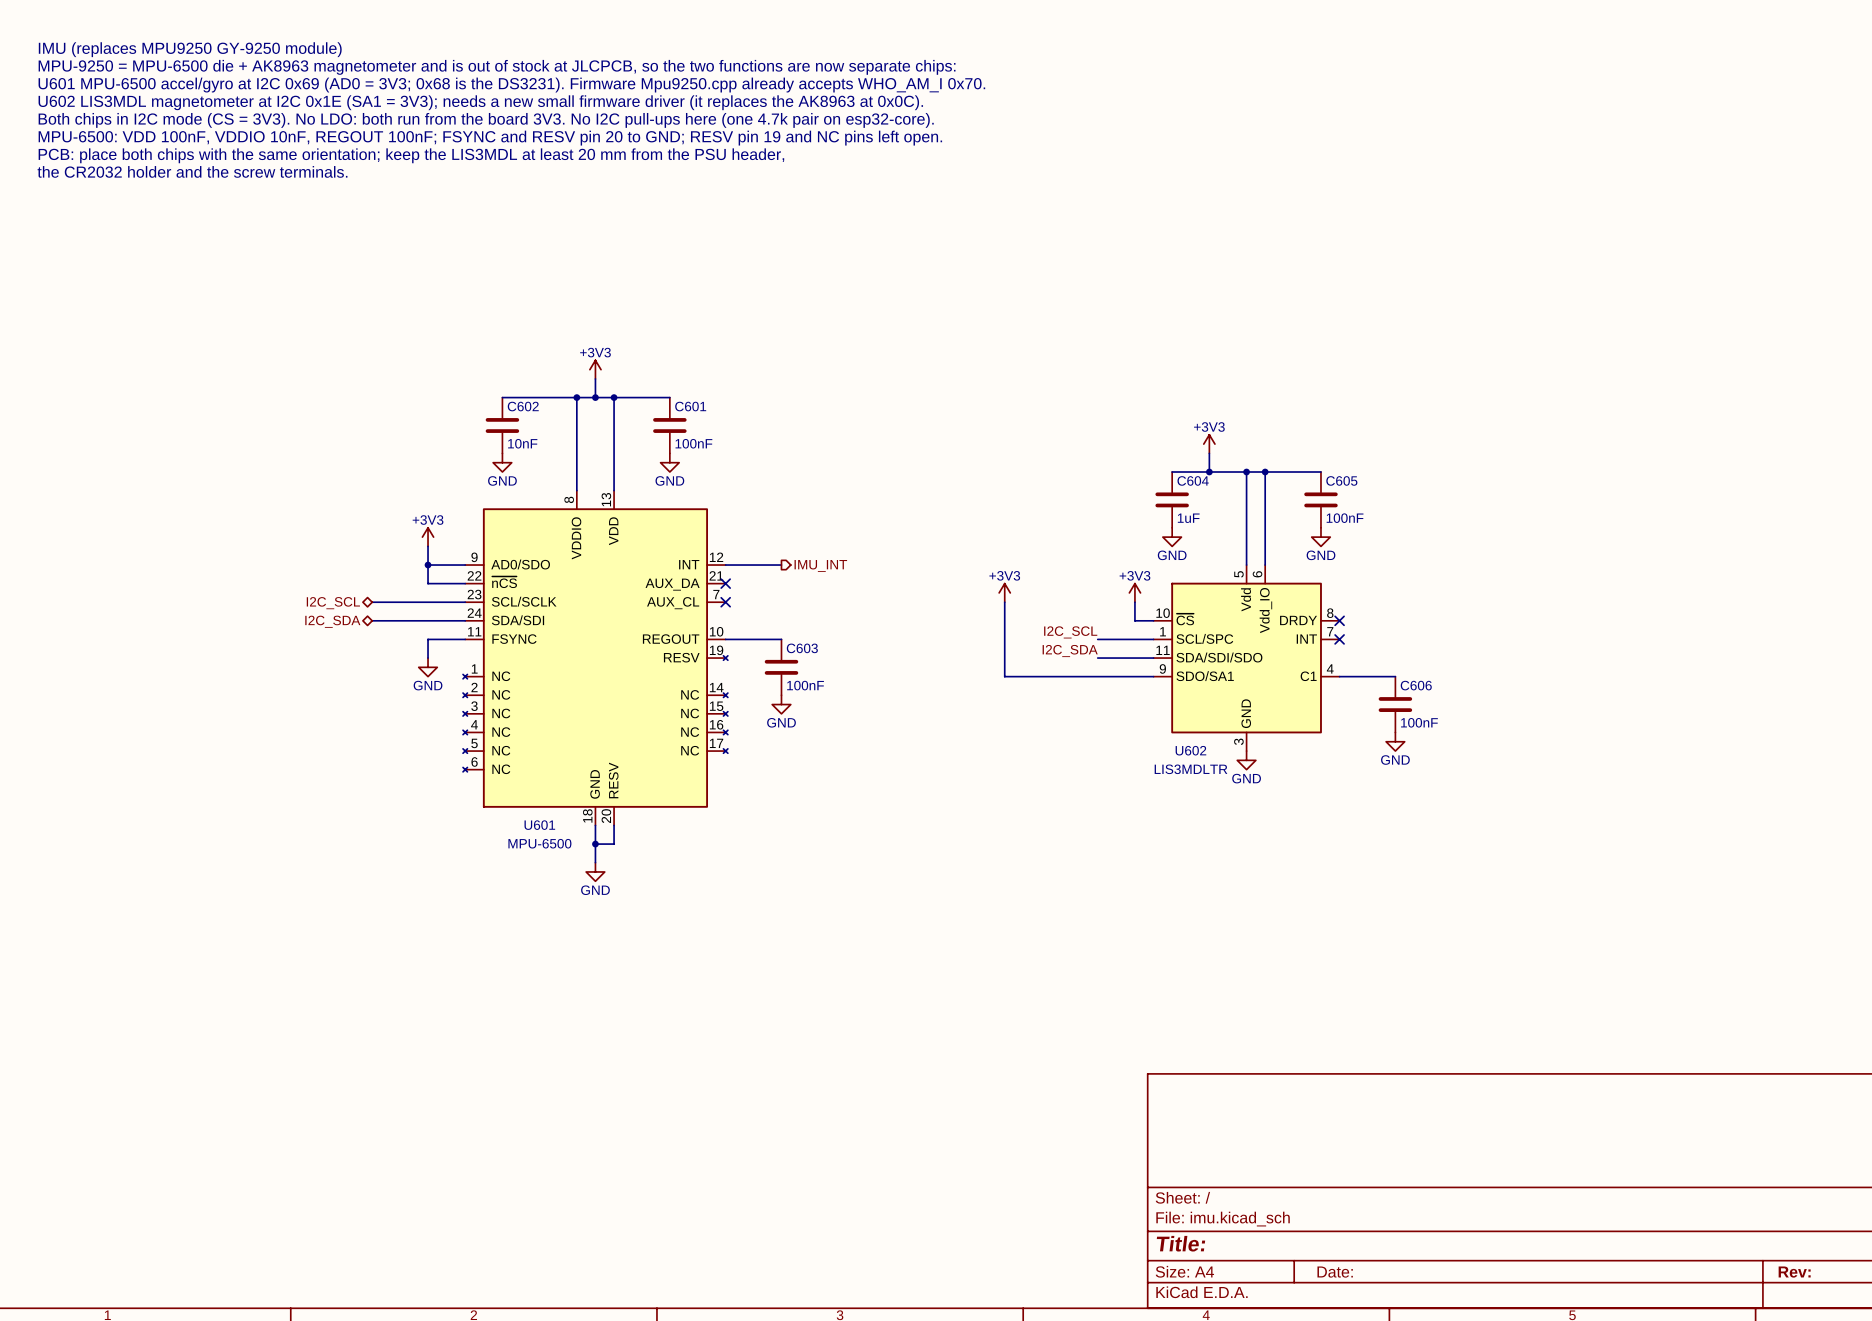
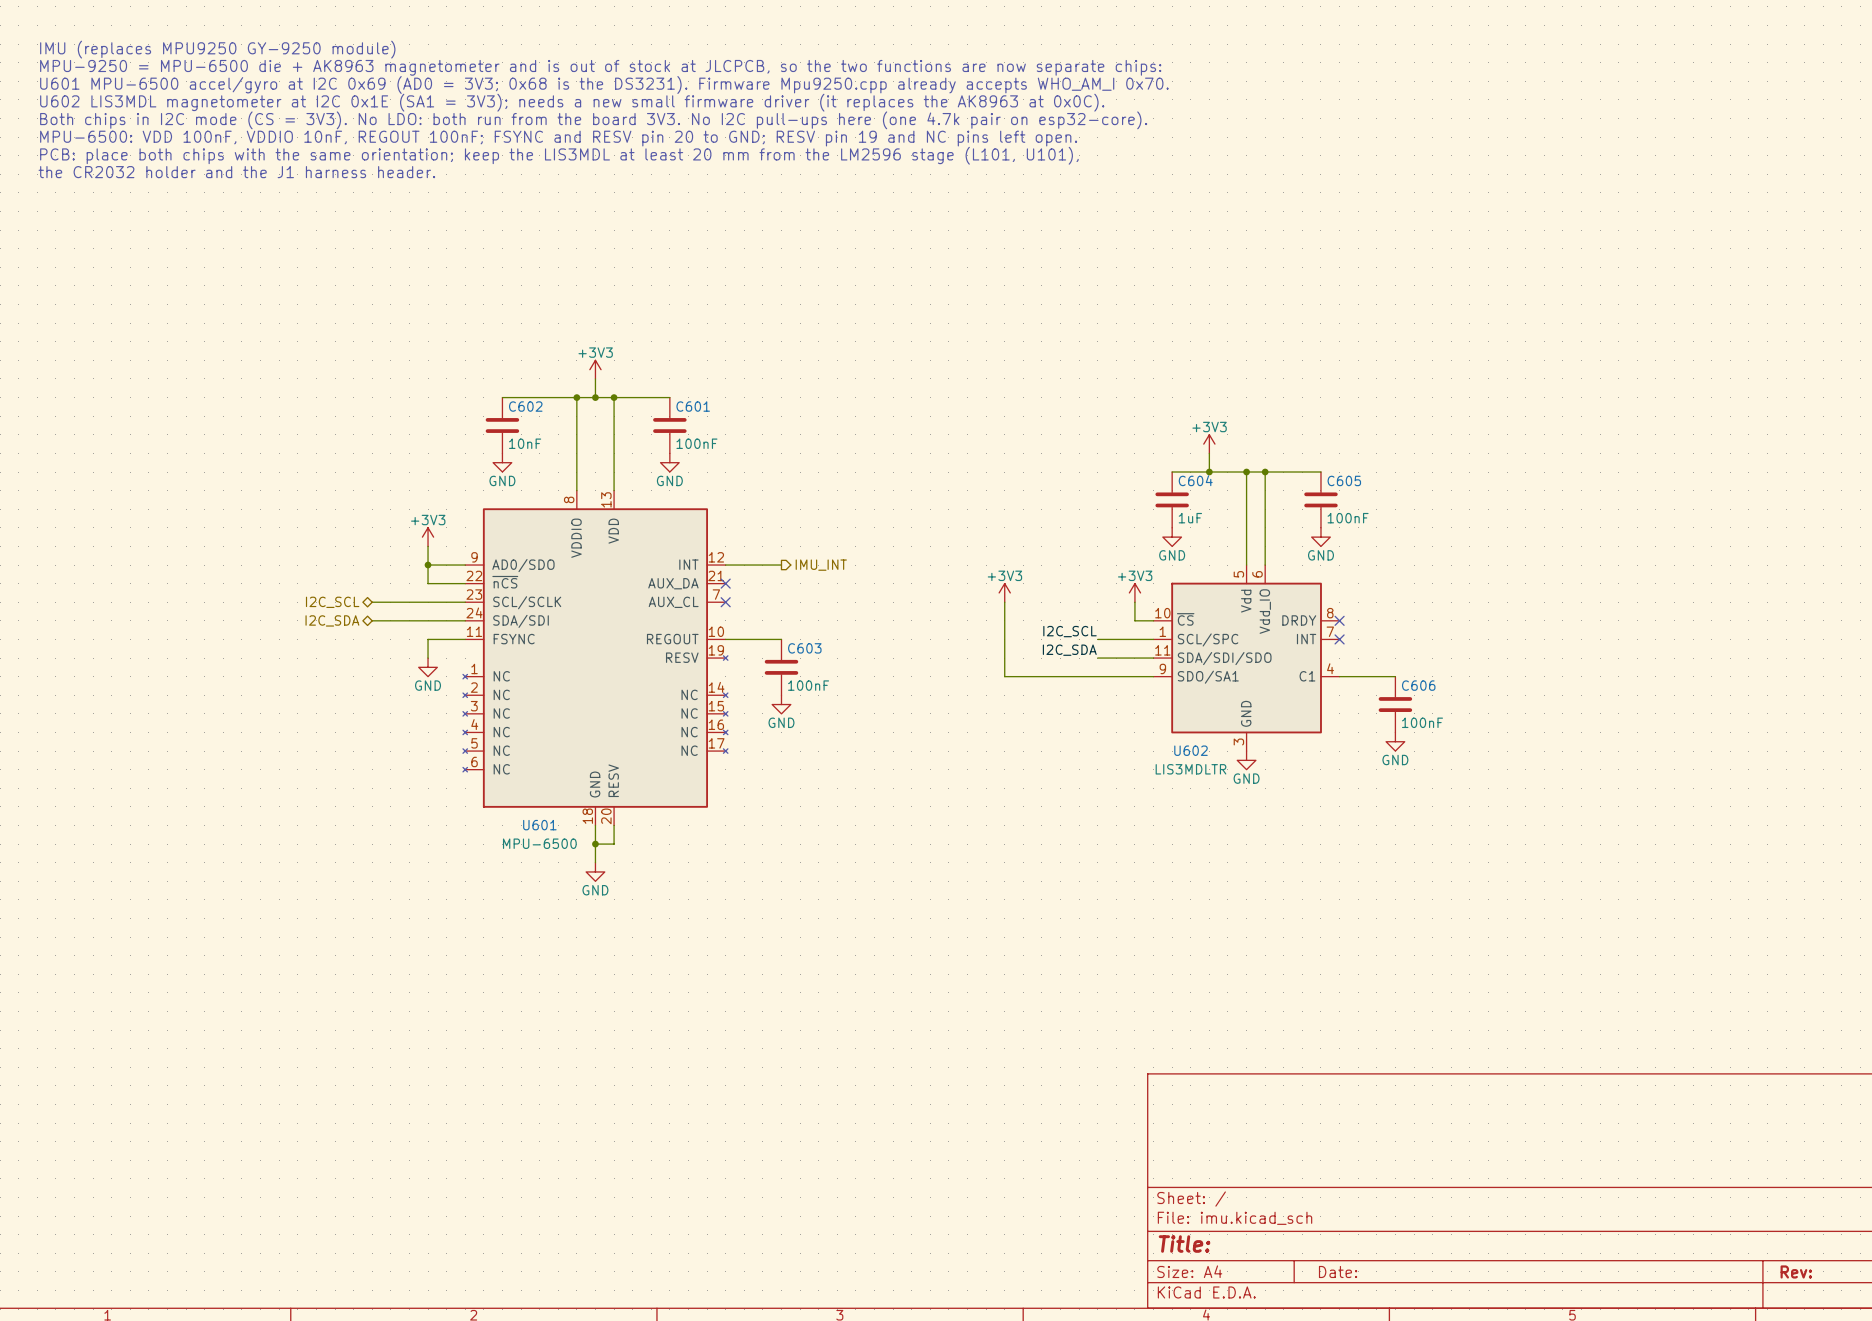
text: PCB: place both chips with the same orientation; keep the LIS3MDL at least 20 mm from the PSU header, (411, 155) -> PCB: place both chips with the same orientation; keep the LIS3MDL at least 20 mm from the LM2596 stage (L101, U101), (559, 155)
text: the CR2032 holder and the screw terminals. (192, 171) -> the CR2032 holder and the J1 harness header. (236, 172)

